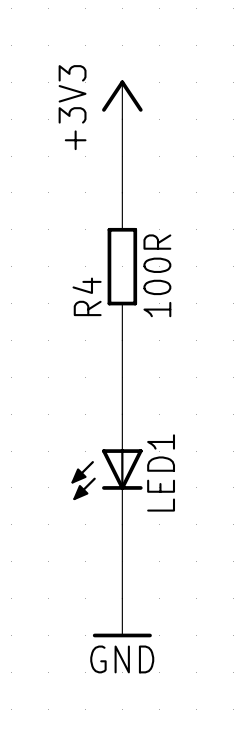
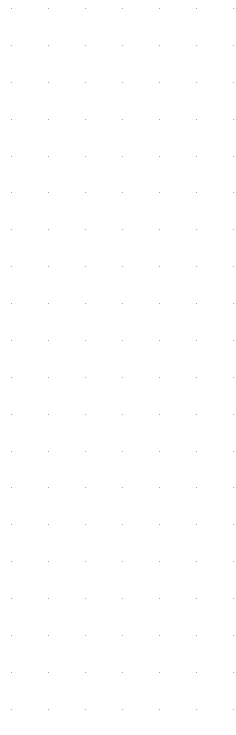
power symbol: +3V3 (122, 99) -> none
wire: (122, 119) (122, 192) -> none
R4: 100R (122, 266) -> none
wire: (122, 340) (122, 414) -> none
LED1: (107, 469) -> none
wire: (122, 524) (122, 598) -> none
power symbol: GND (122, 617) -> none

